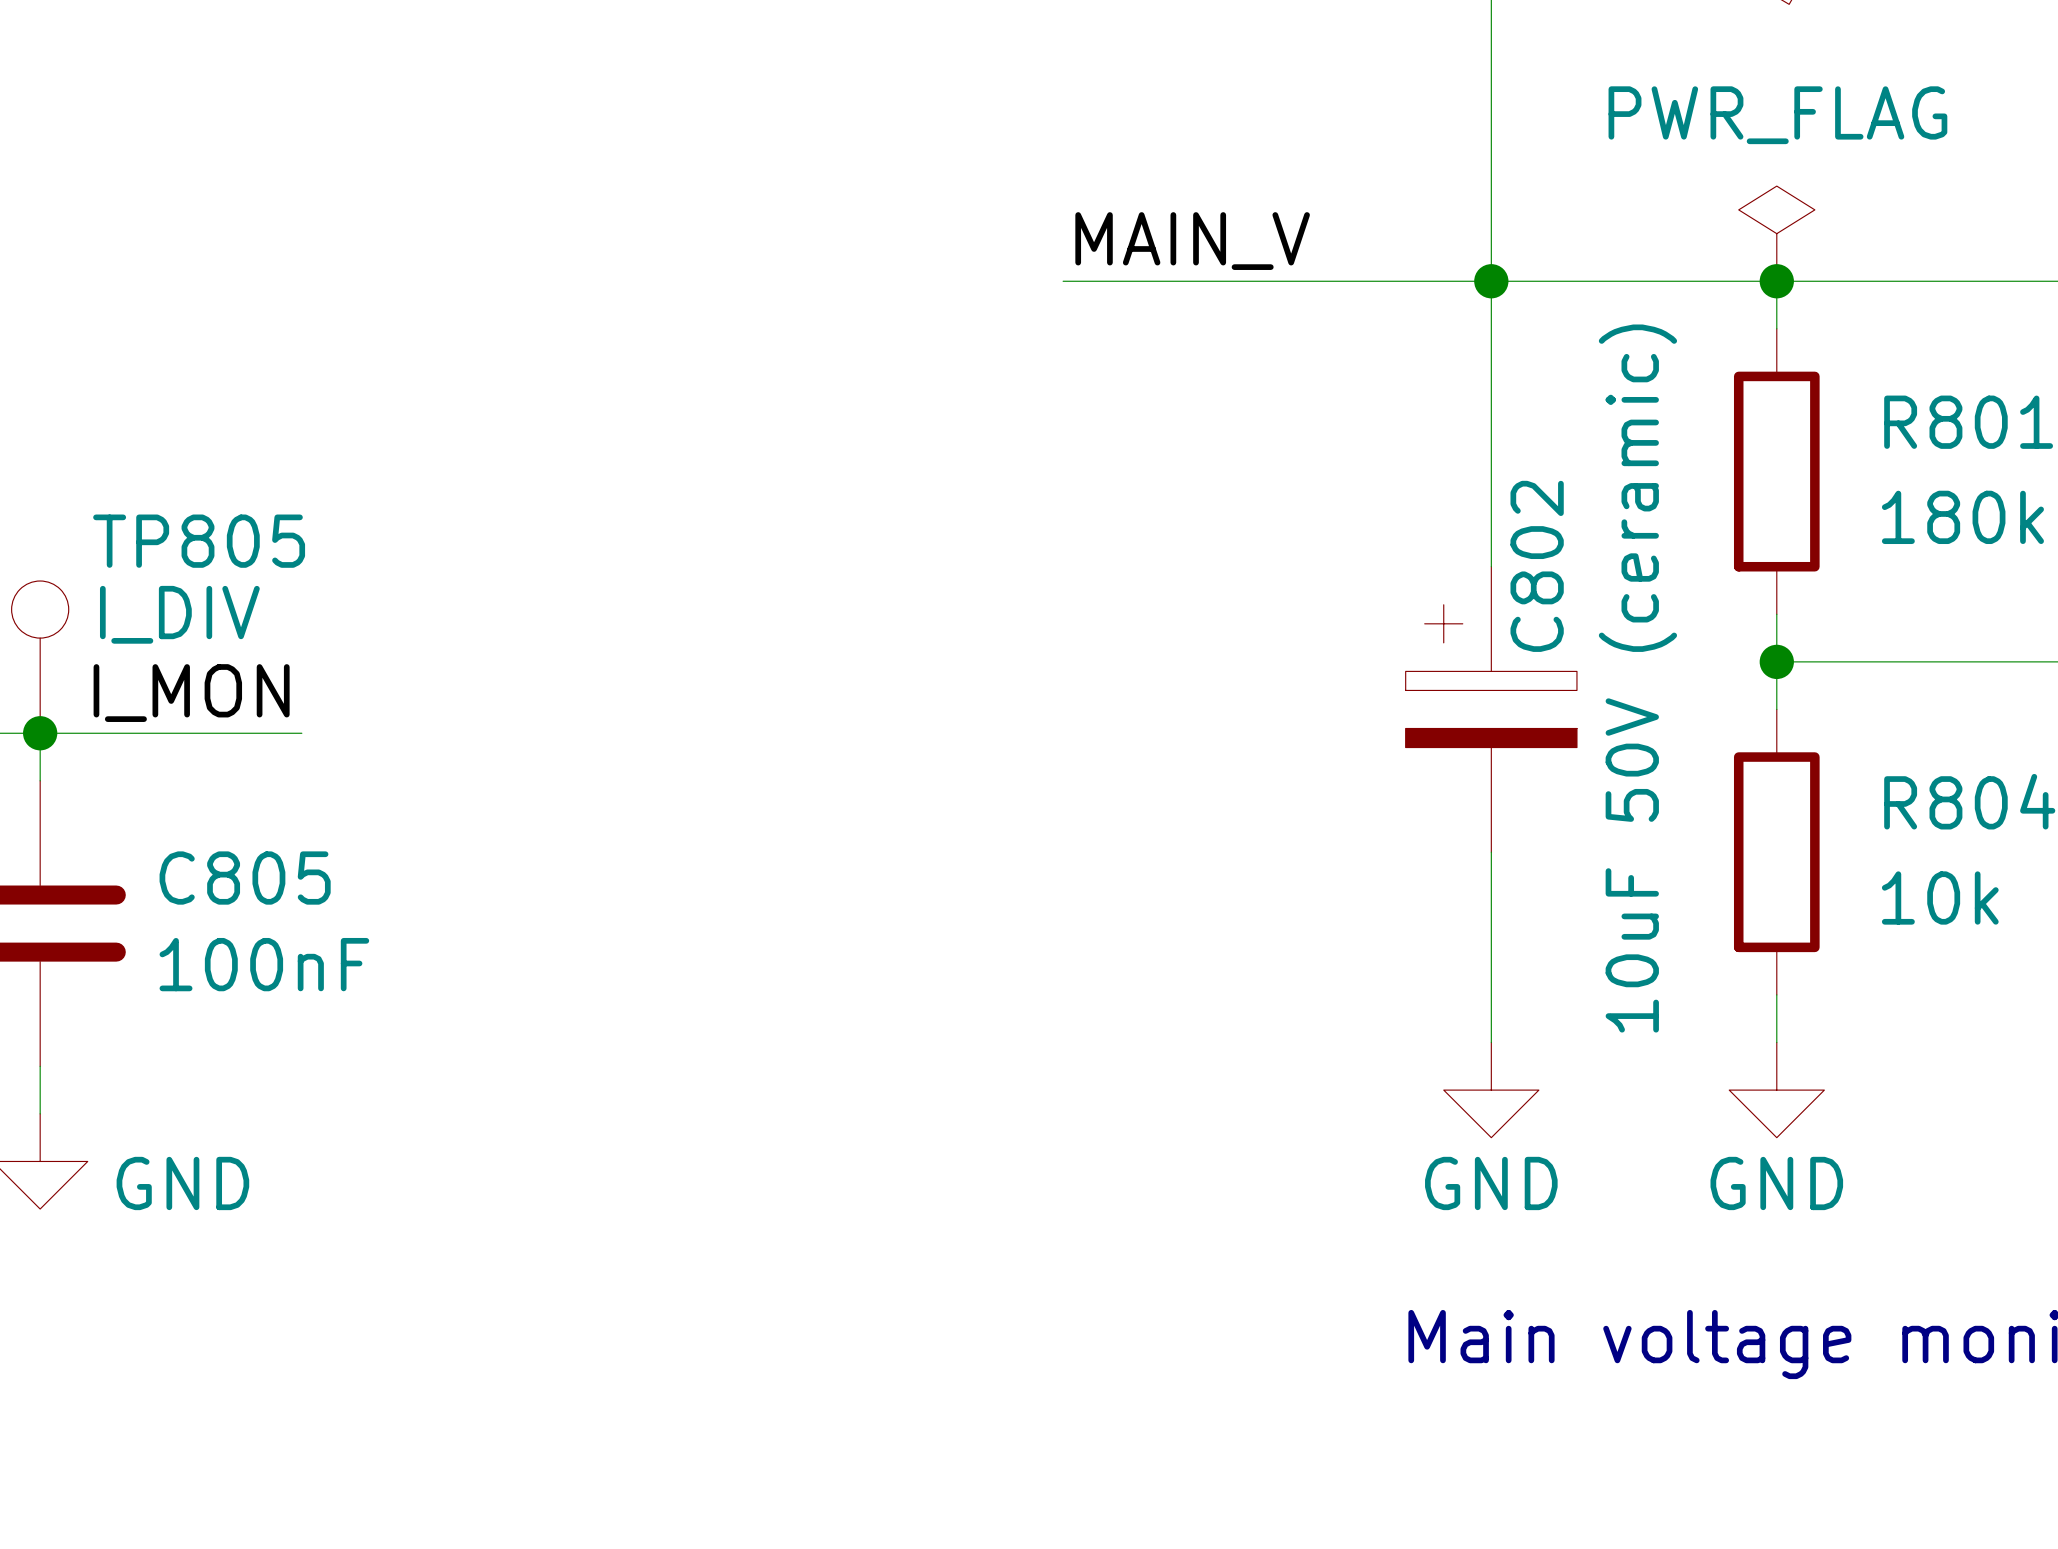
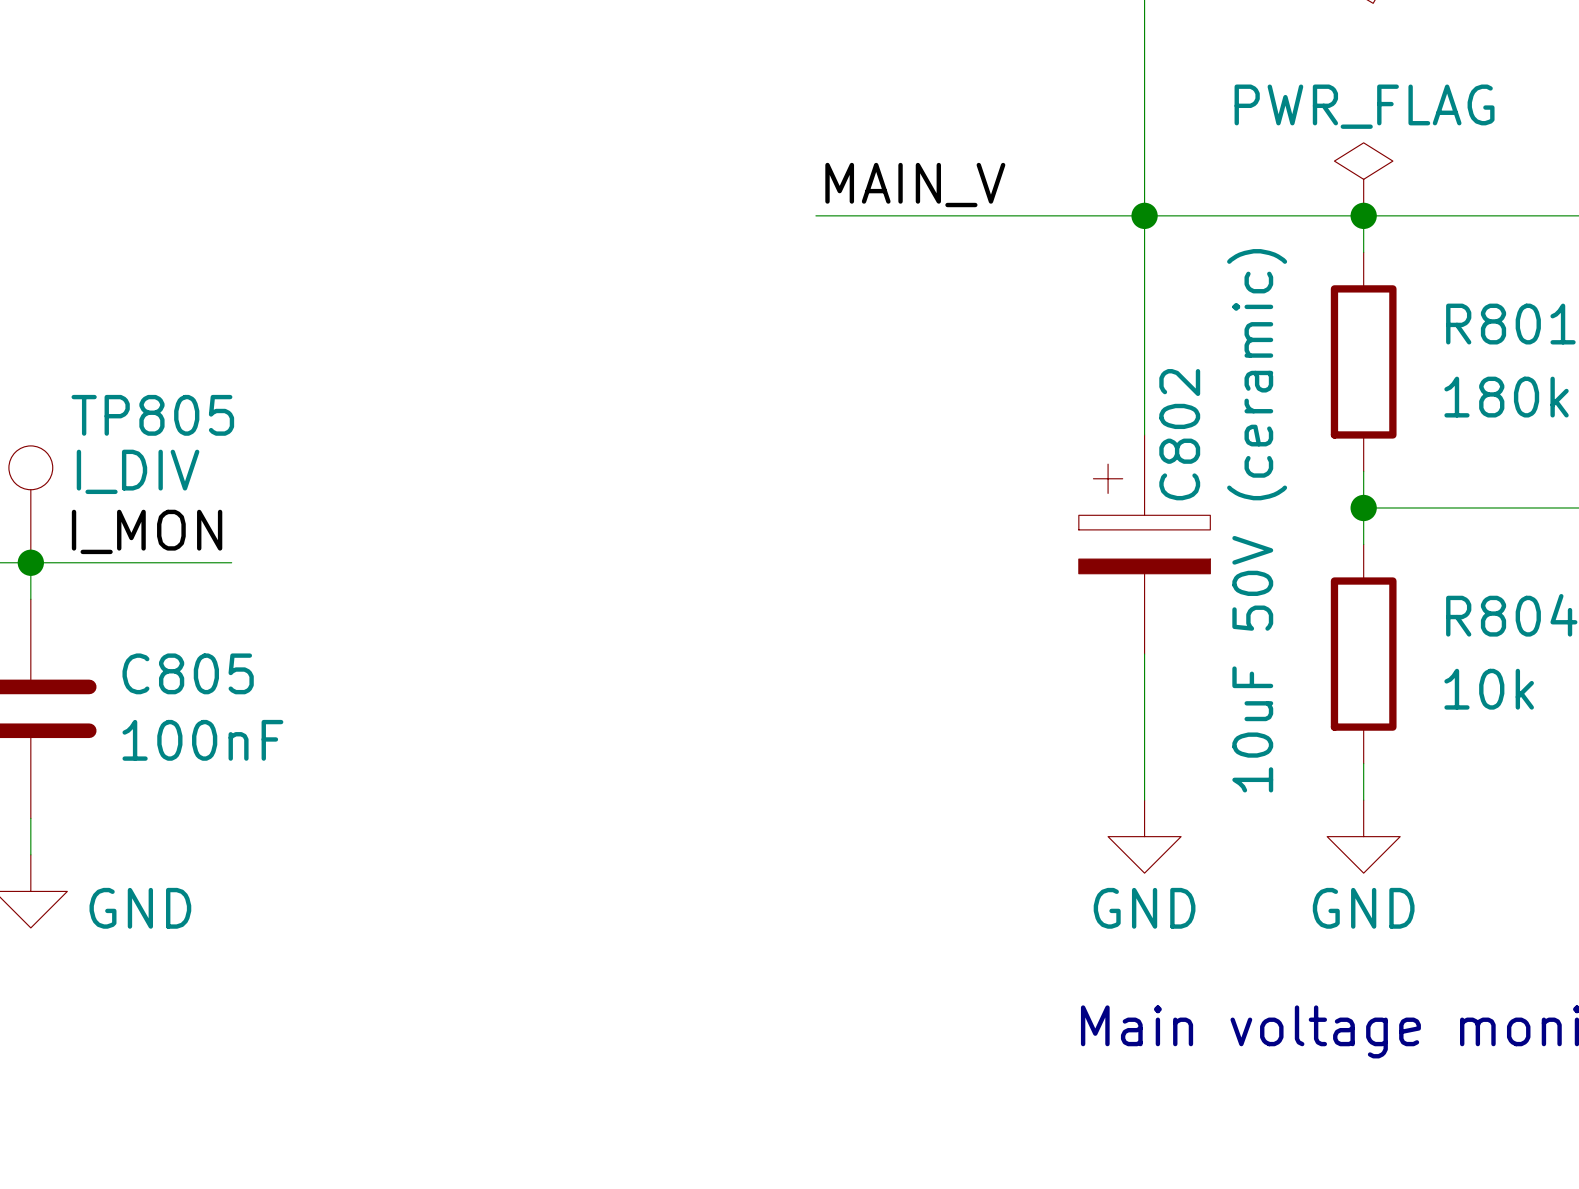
power symbol text position: PWR_FLAG (1777, 115) -> PWR_FLAG (1364, 106)

